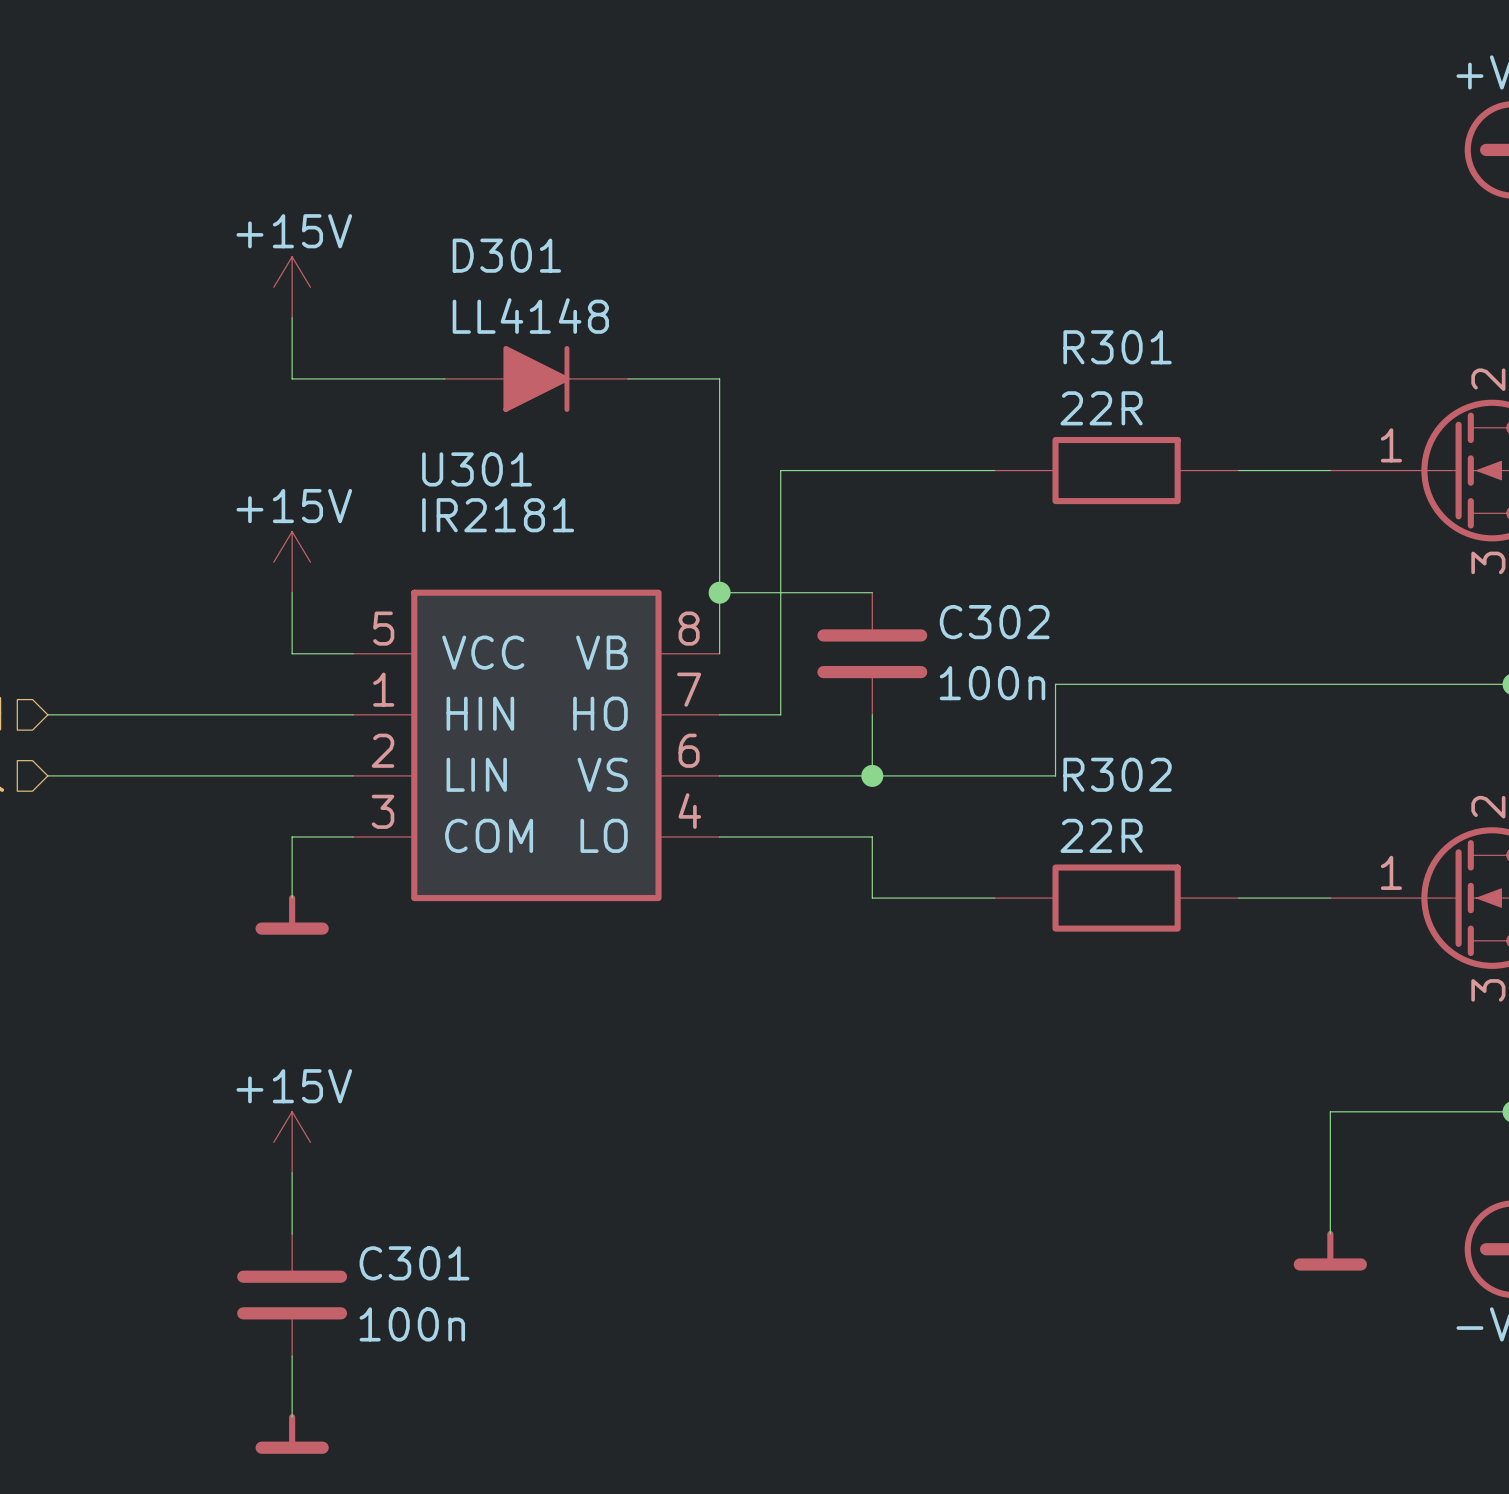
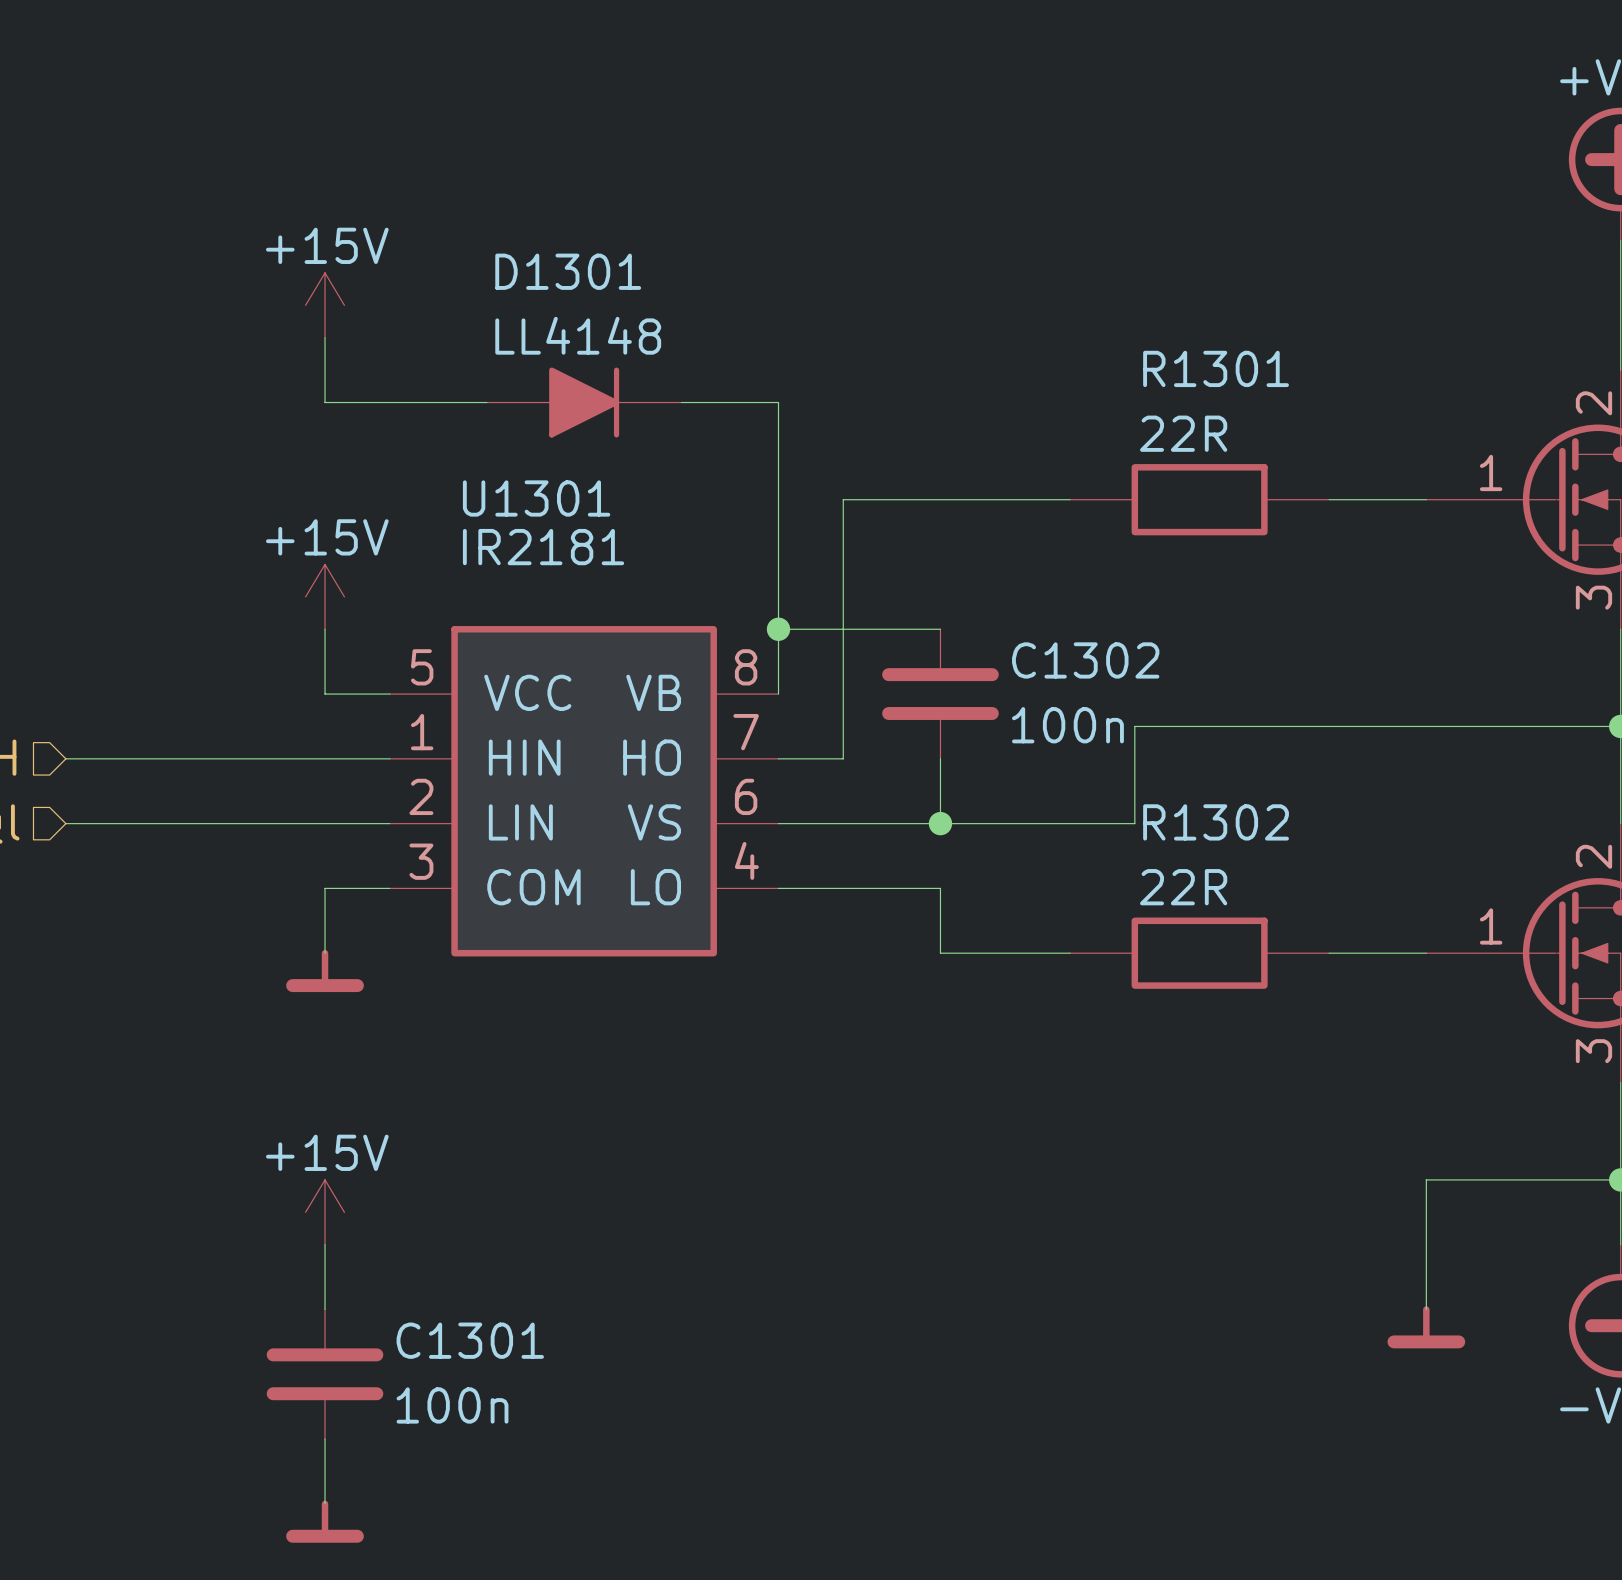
D301 name: D301 (506, 255) -> D1301 (568, 271)
R301 name: R301 (1117, 347) -> R1301 (1216, 368)
U301 name: U301 (477, 469) -> U1301 (536, 498)
C302 name: C302 (994, 622) -> C1302 (1085, 660)
R302 name: R302 (1117, 774) -> R1302 (1216, 822)
C301 name: C301 (414, 1263) -> C1301 (470, 1340)

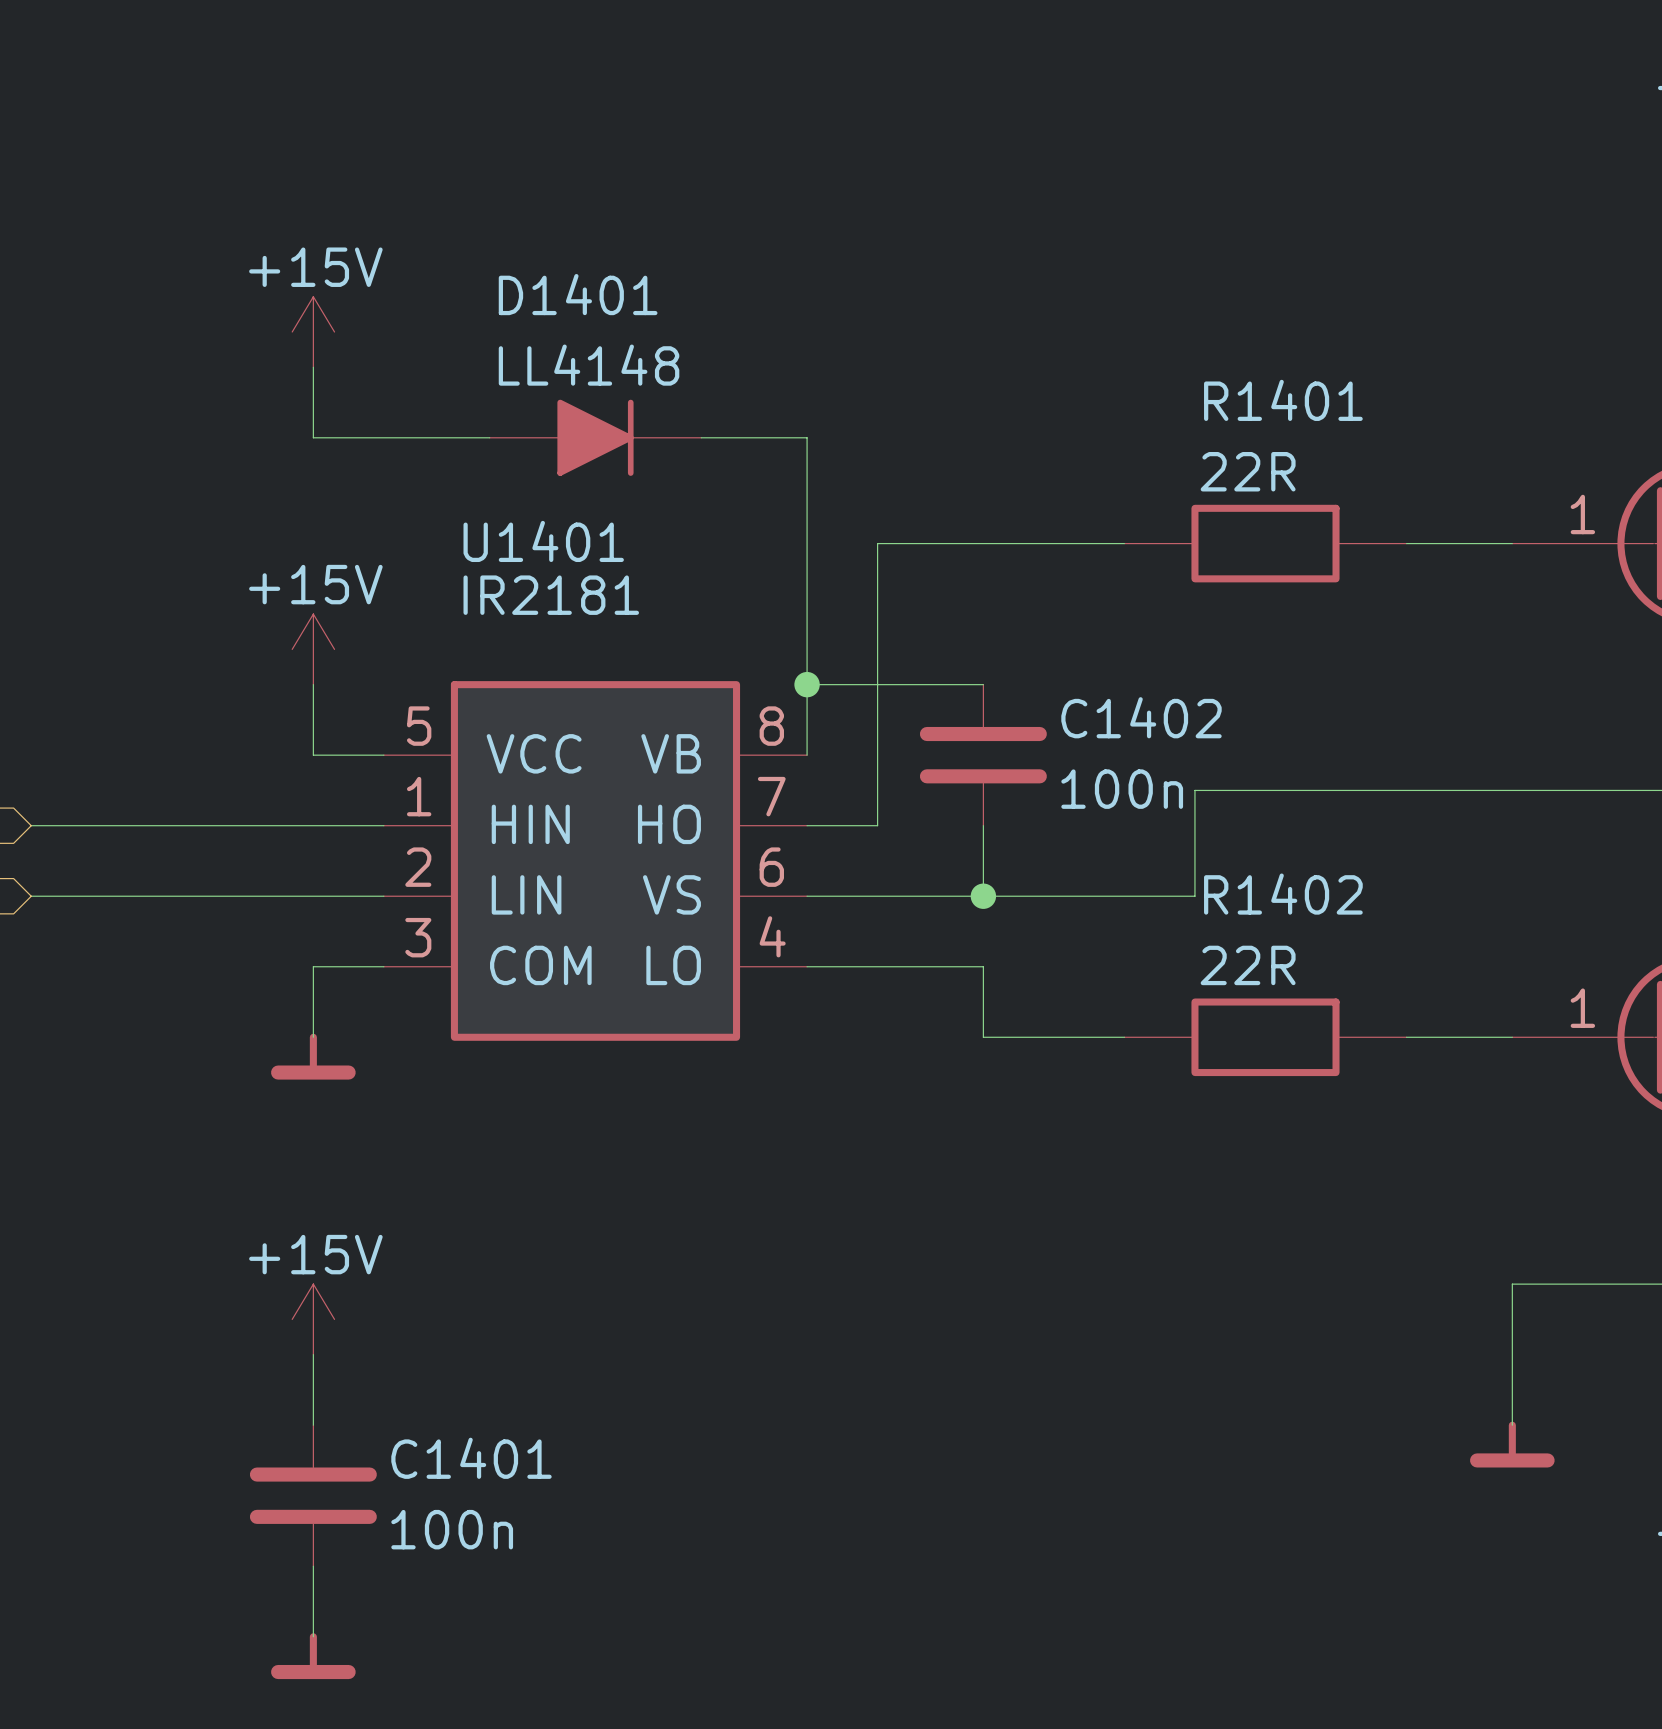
D1301 name: D1301 (568, 271) -> D1401 (578, 294)
R1301 name: R1301 (1216, 368) -> R1401 (1283, 400)
U1301 name: U1301 (536, 498) -> U1401 (543, 541)
C1302 name: C1302 (1085, 660) -> C1402 (1141, 717)
R1302 name: R1302 (1216, 822) -> R1402 (1283, 894)
C1301 name: C1301 (470, 1340) -> C1401 (471, 1458)

